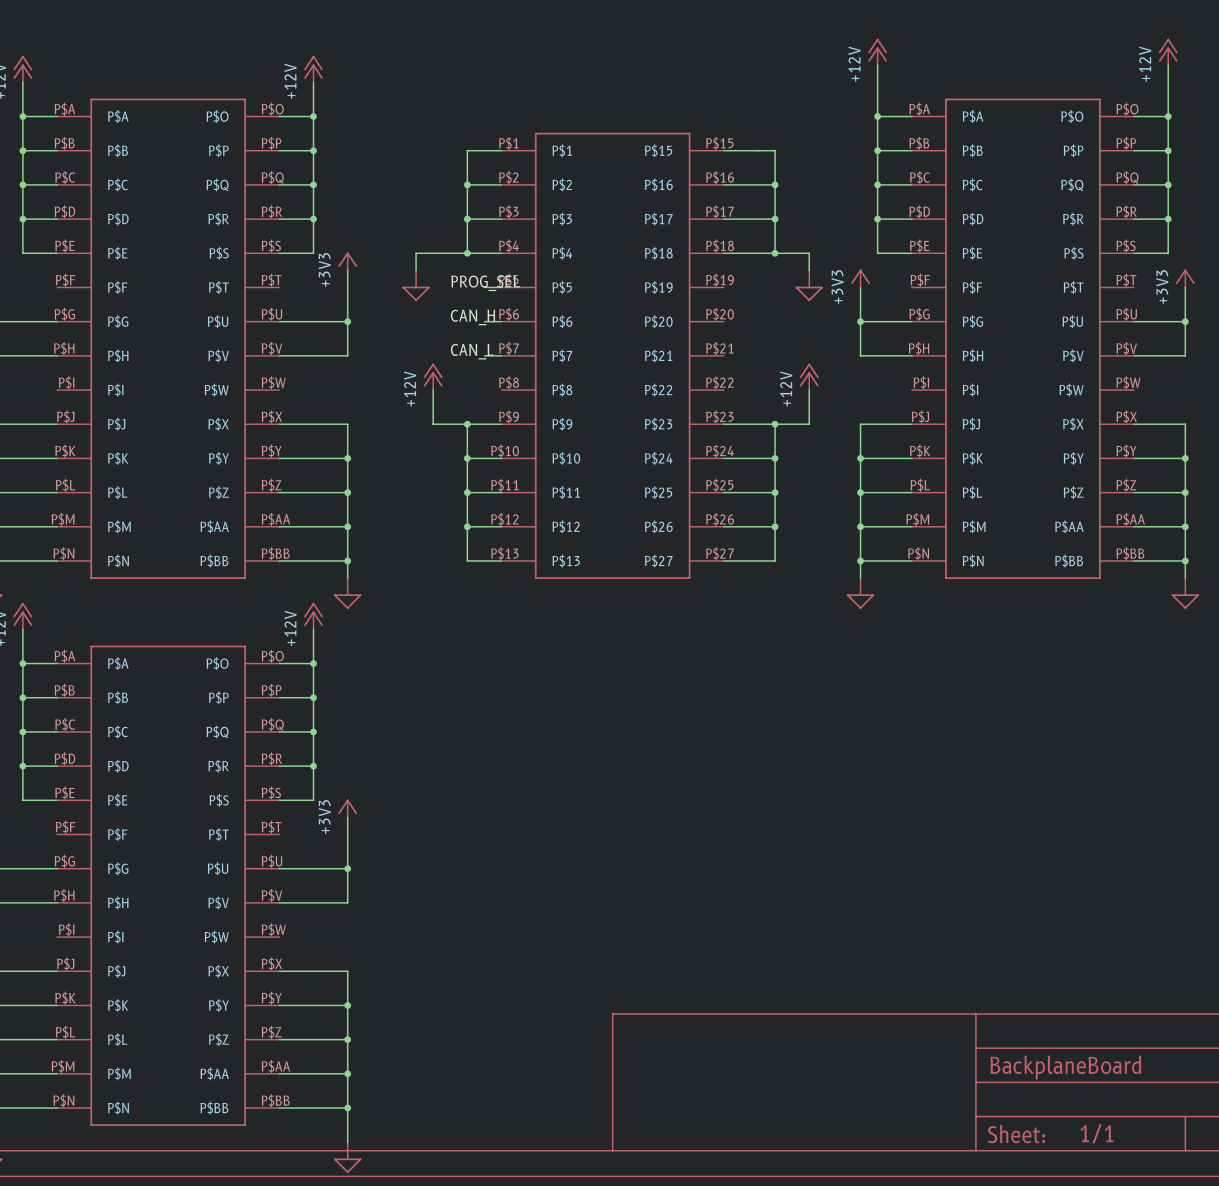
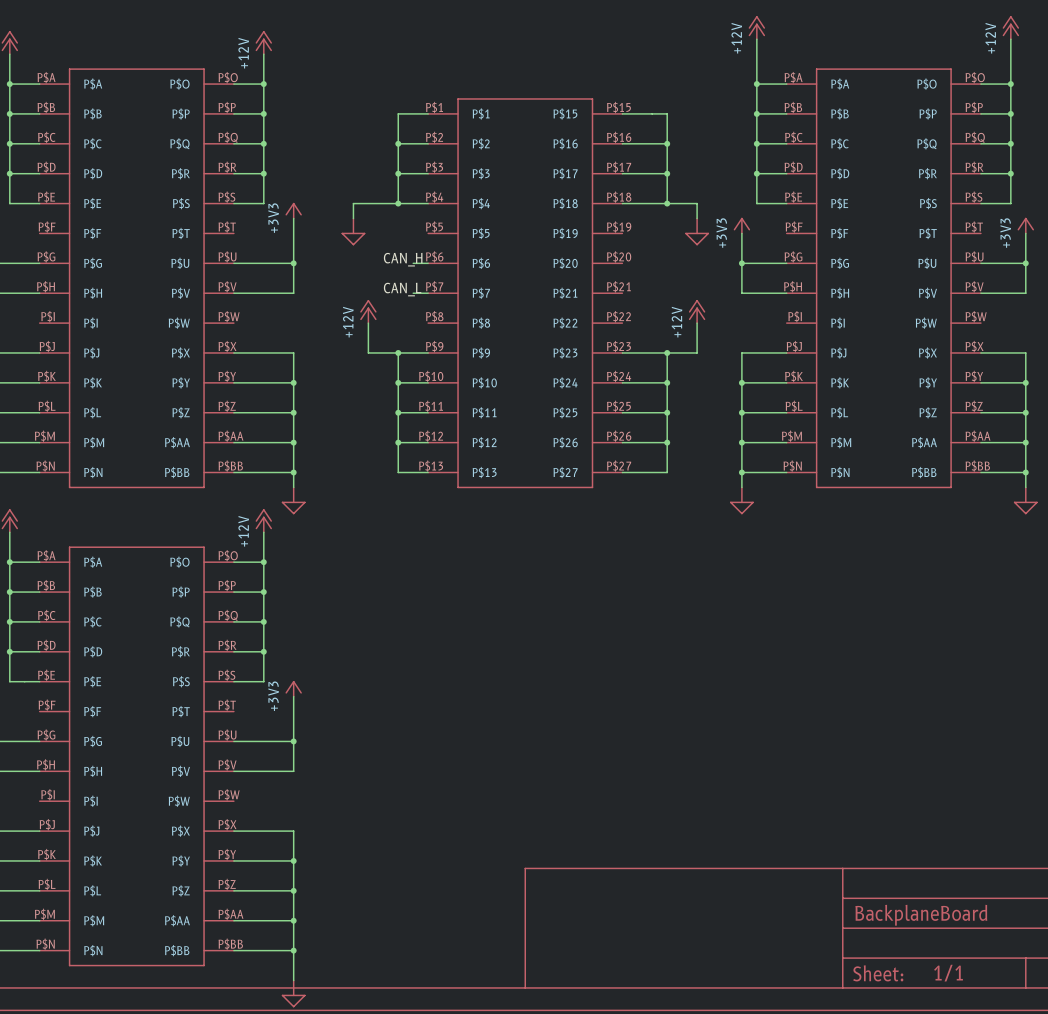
label: PROG_SEL (485, 283) -> none
wire: (484, 287) (501, 287) -> none

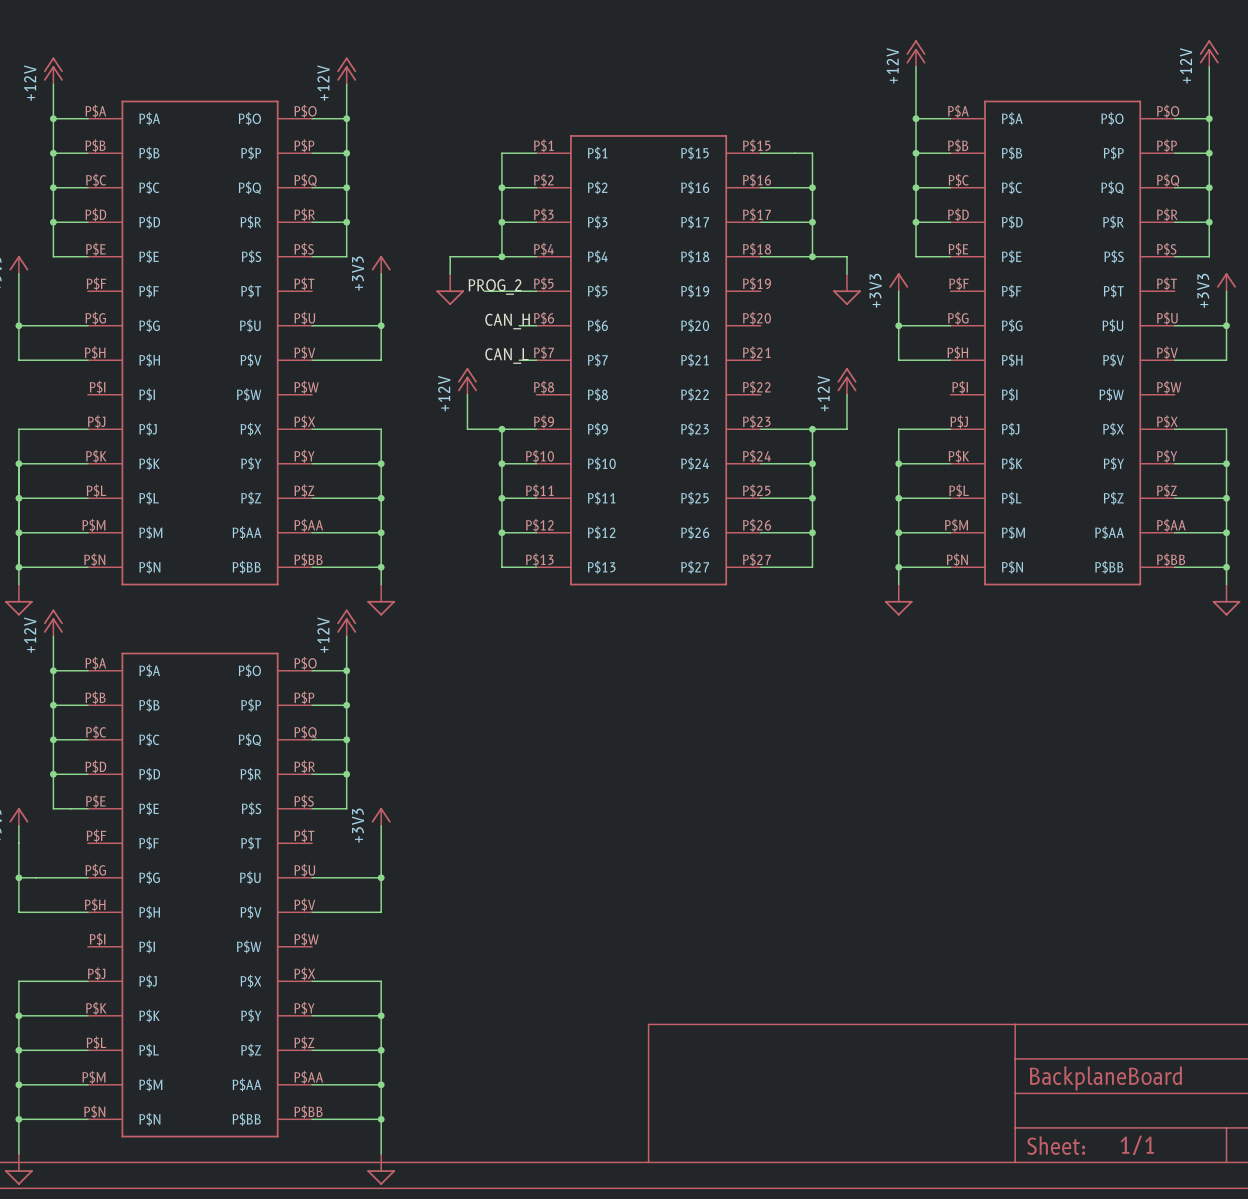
label: none -> PROG_2 (495, 287)
wire: none -> (484, 291) (536, 291)

